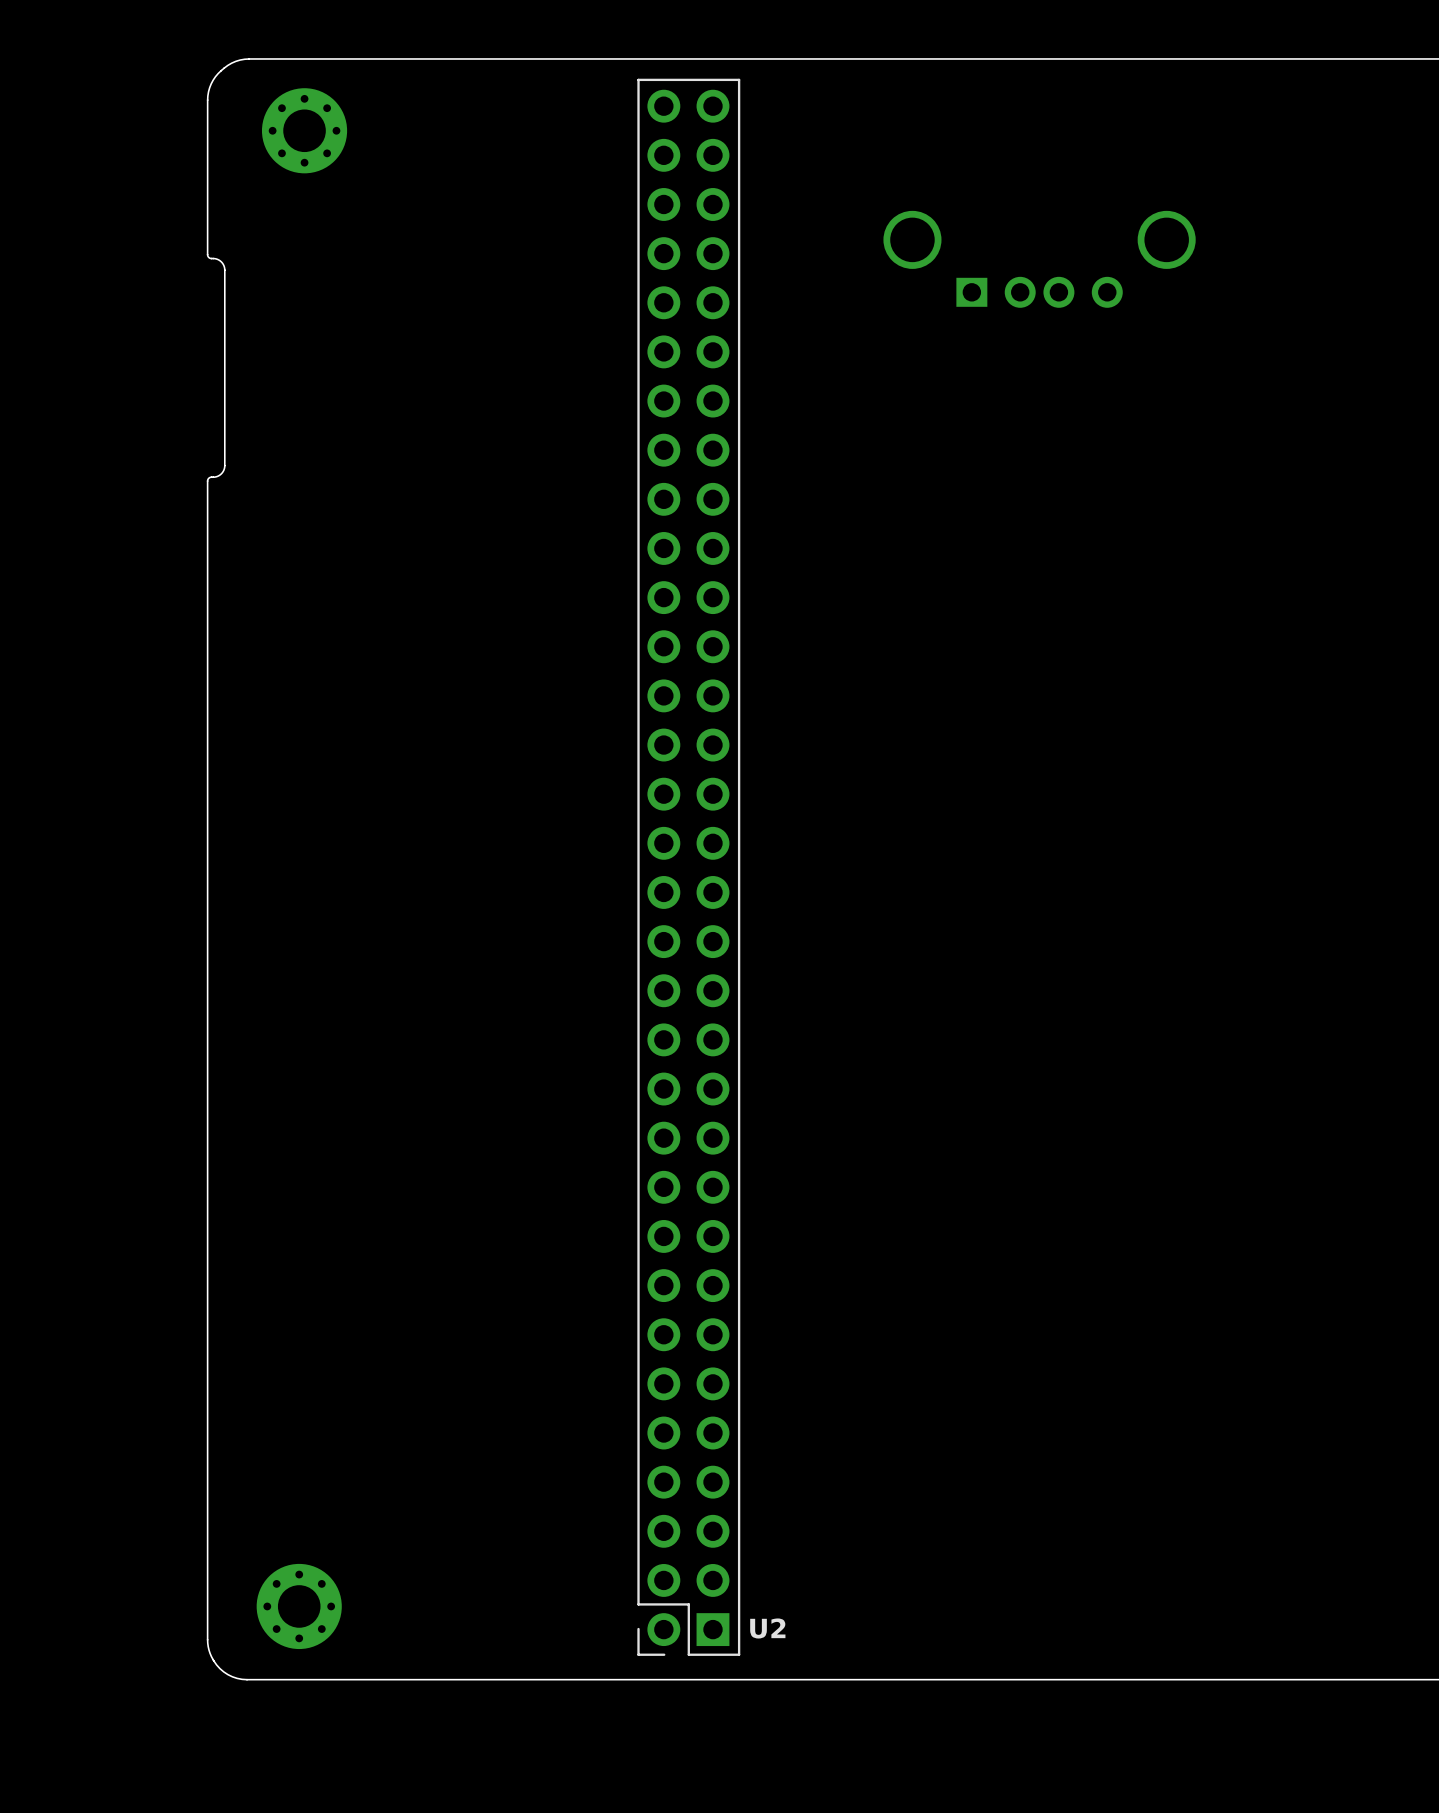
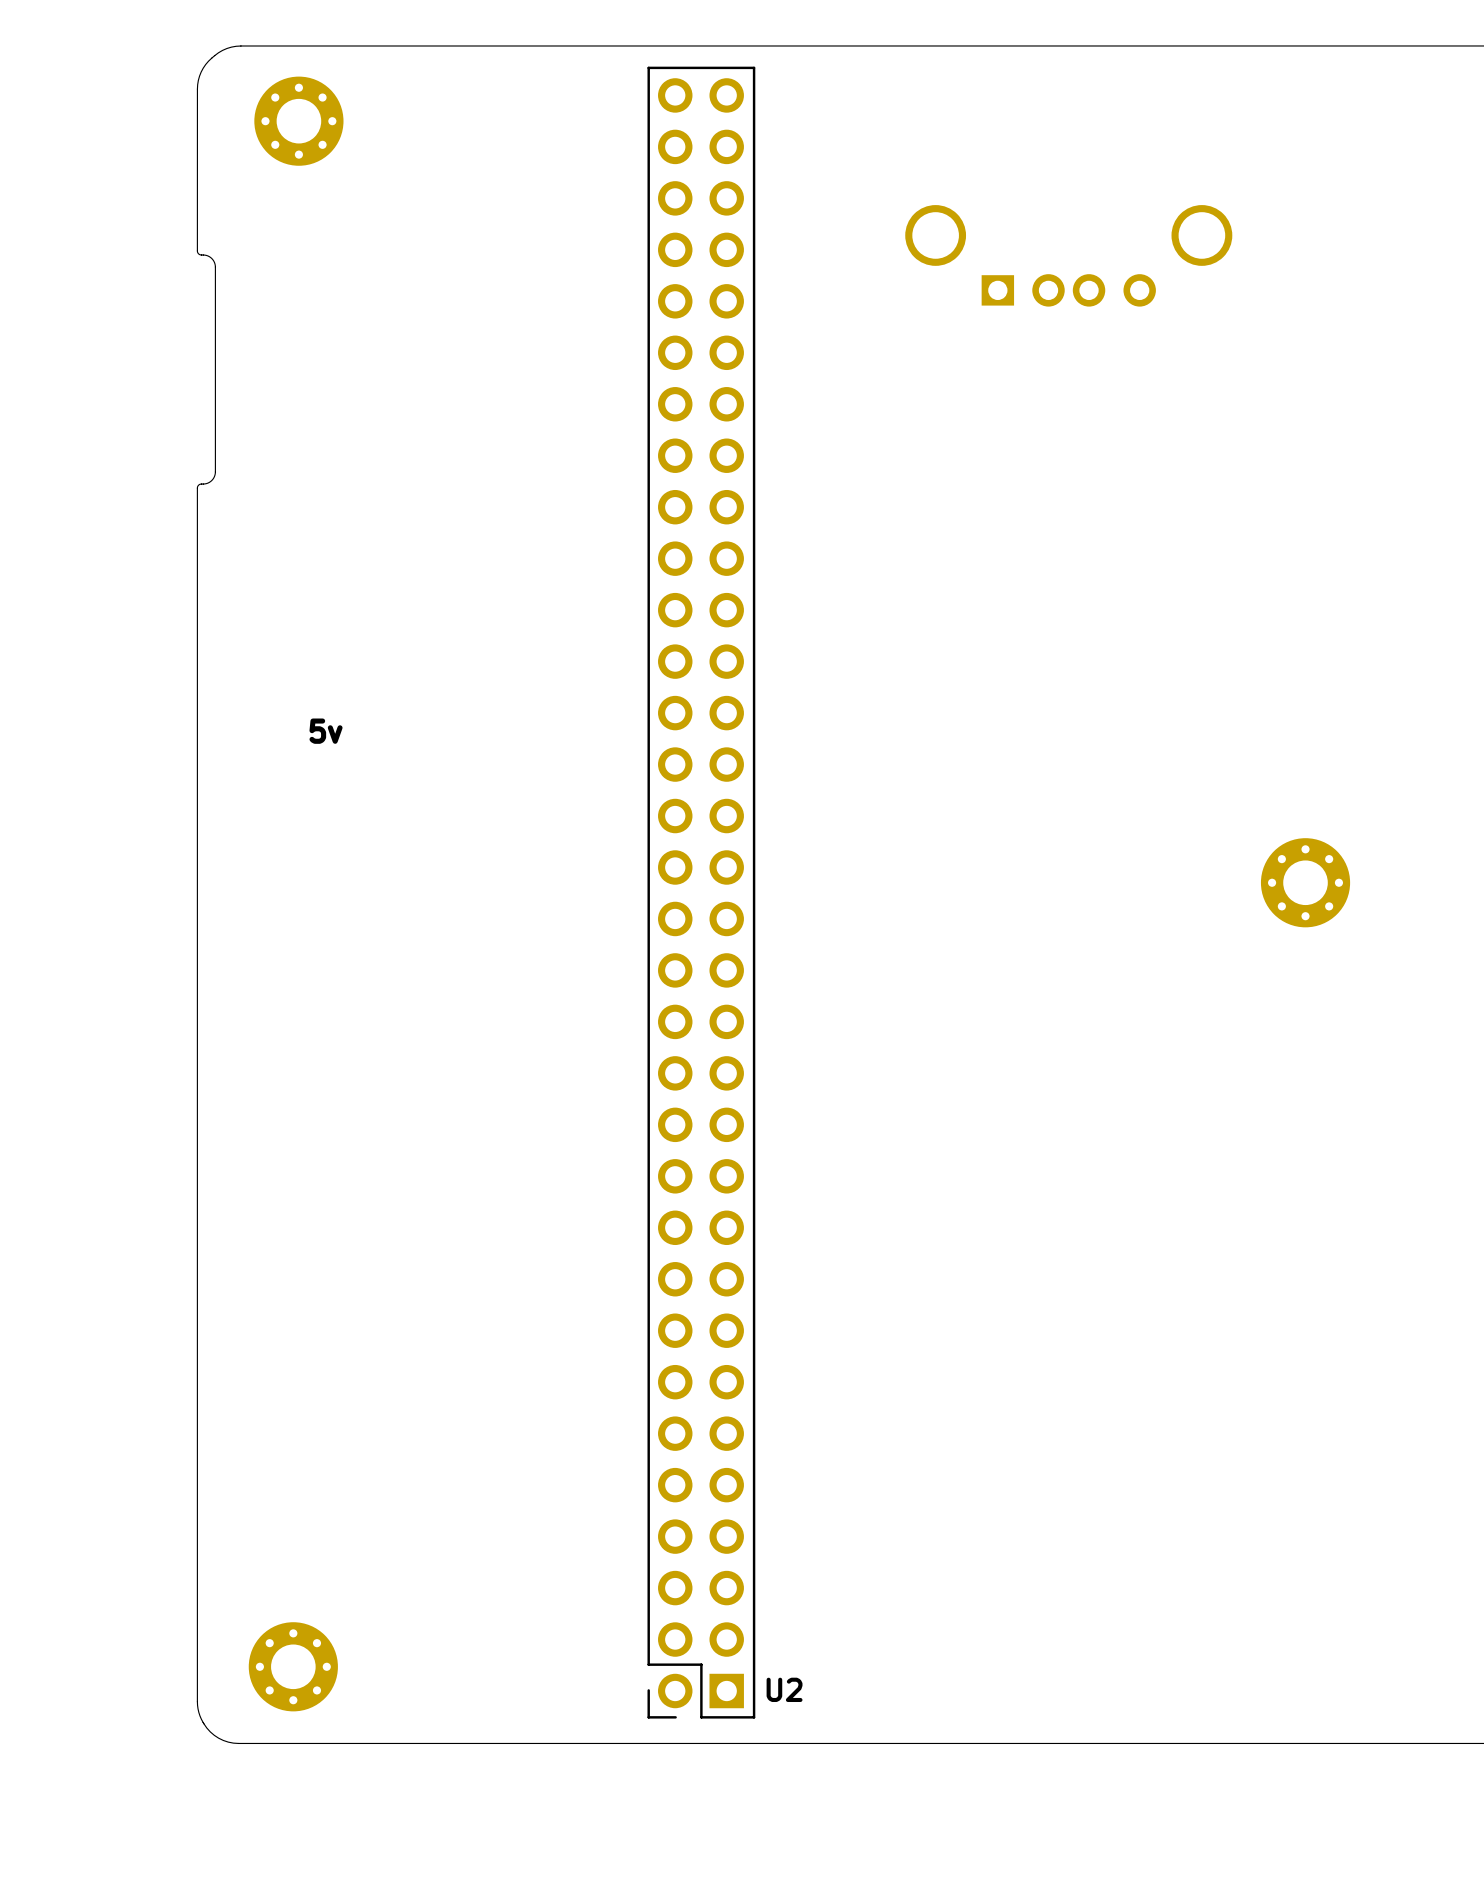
text: none -> 5v (326, 731)
part: none -> (1305, 882)

